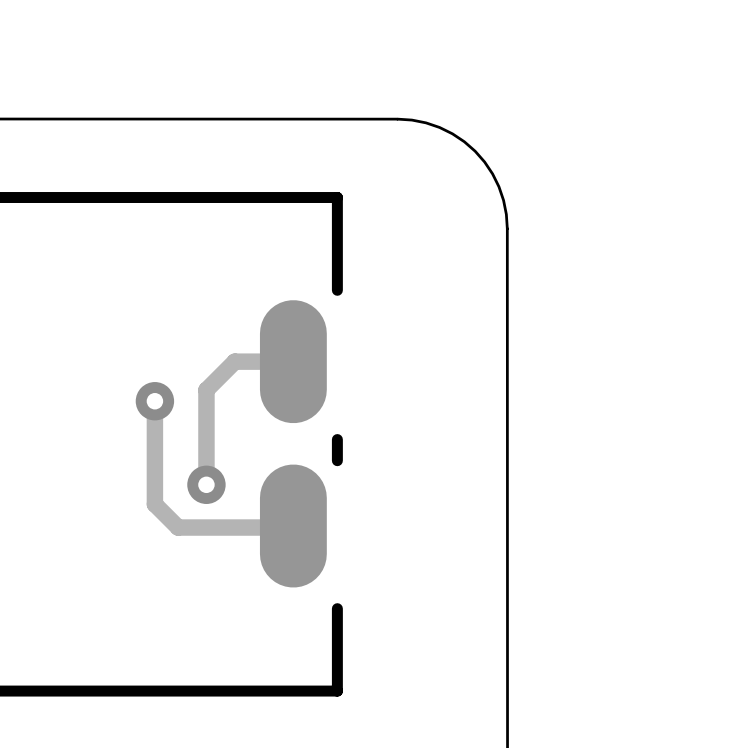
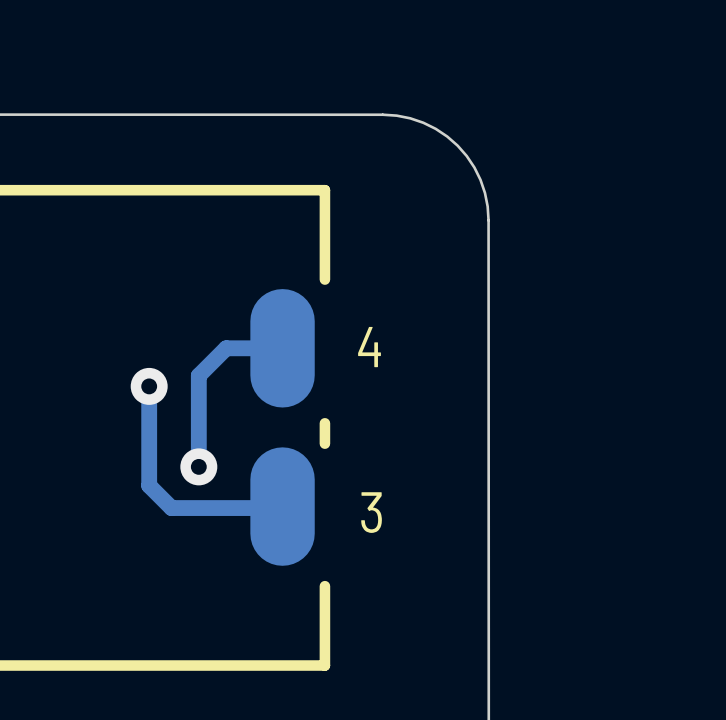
part text: none -> 4 (369, 347)
part text: none -> 3 (371, 512)

